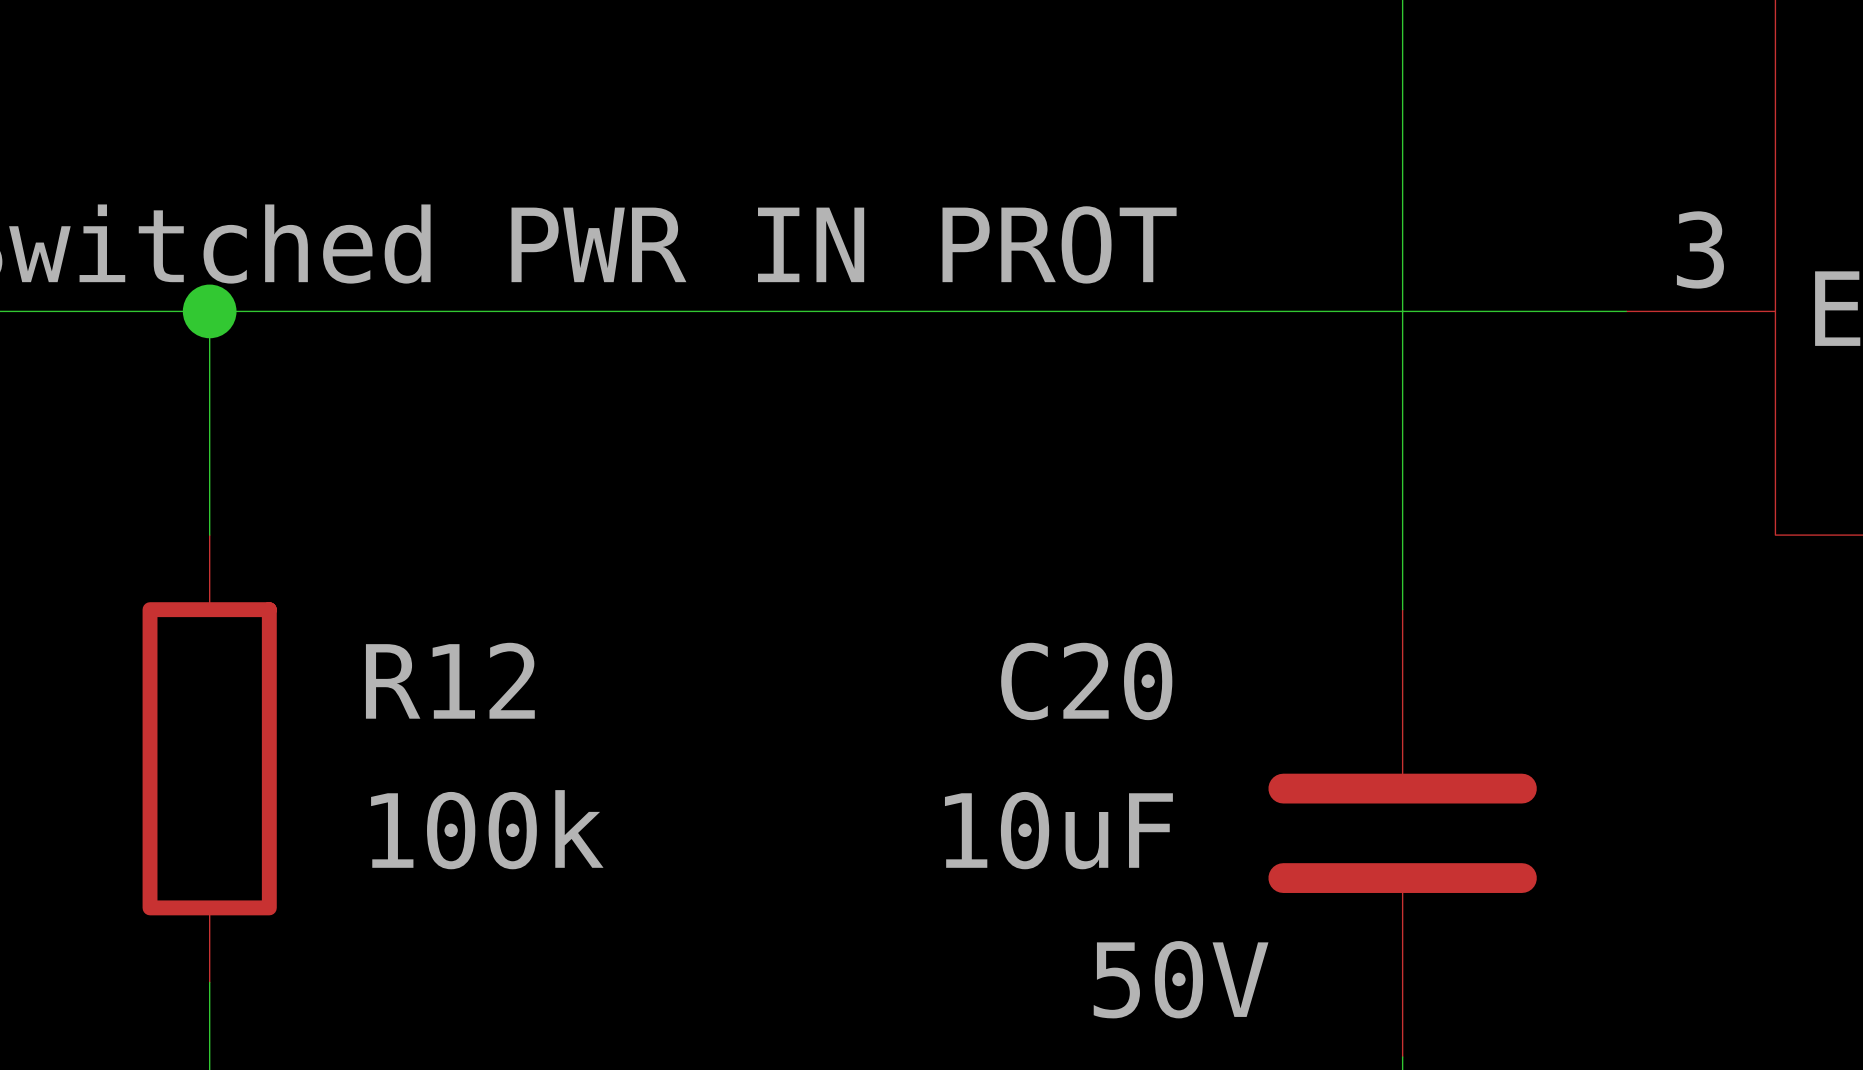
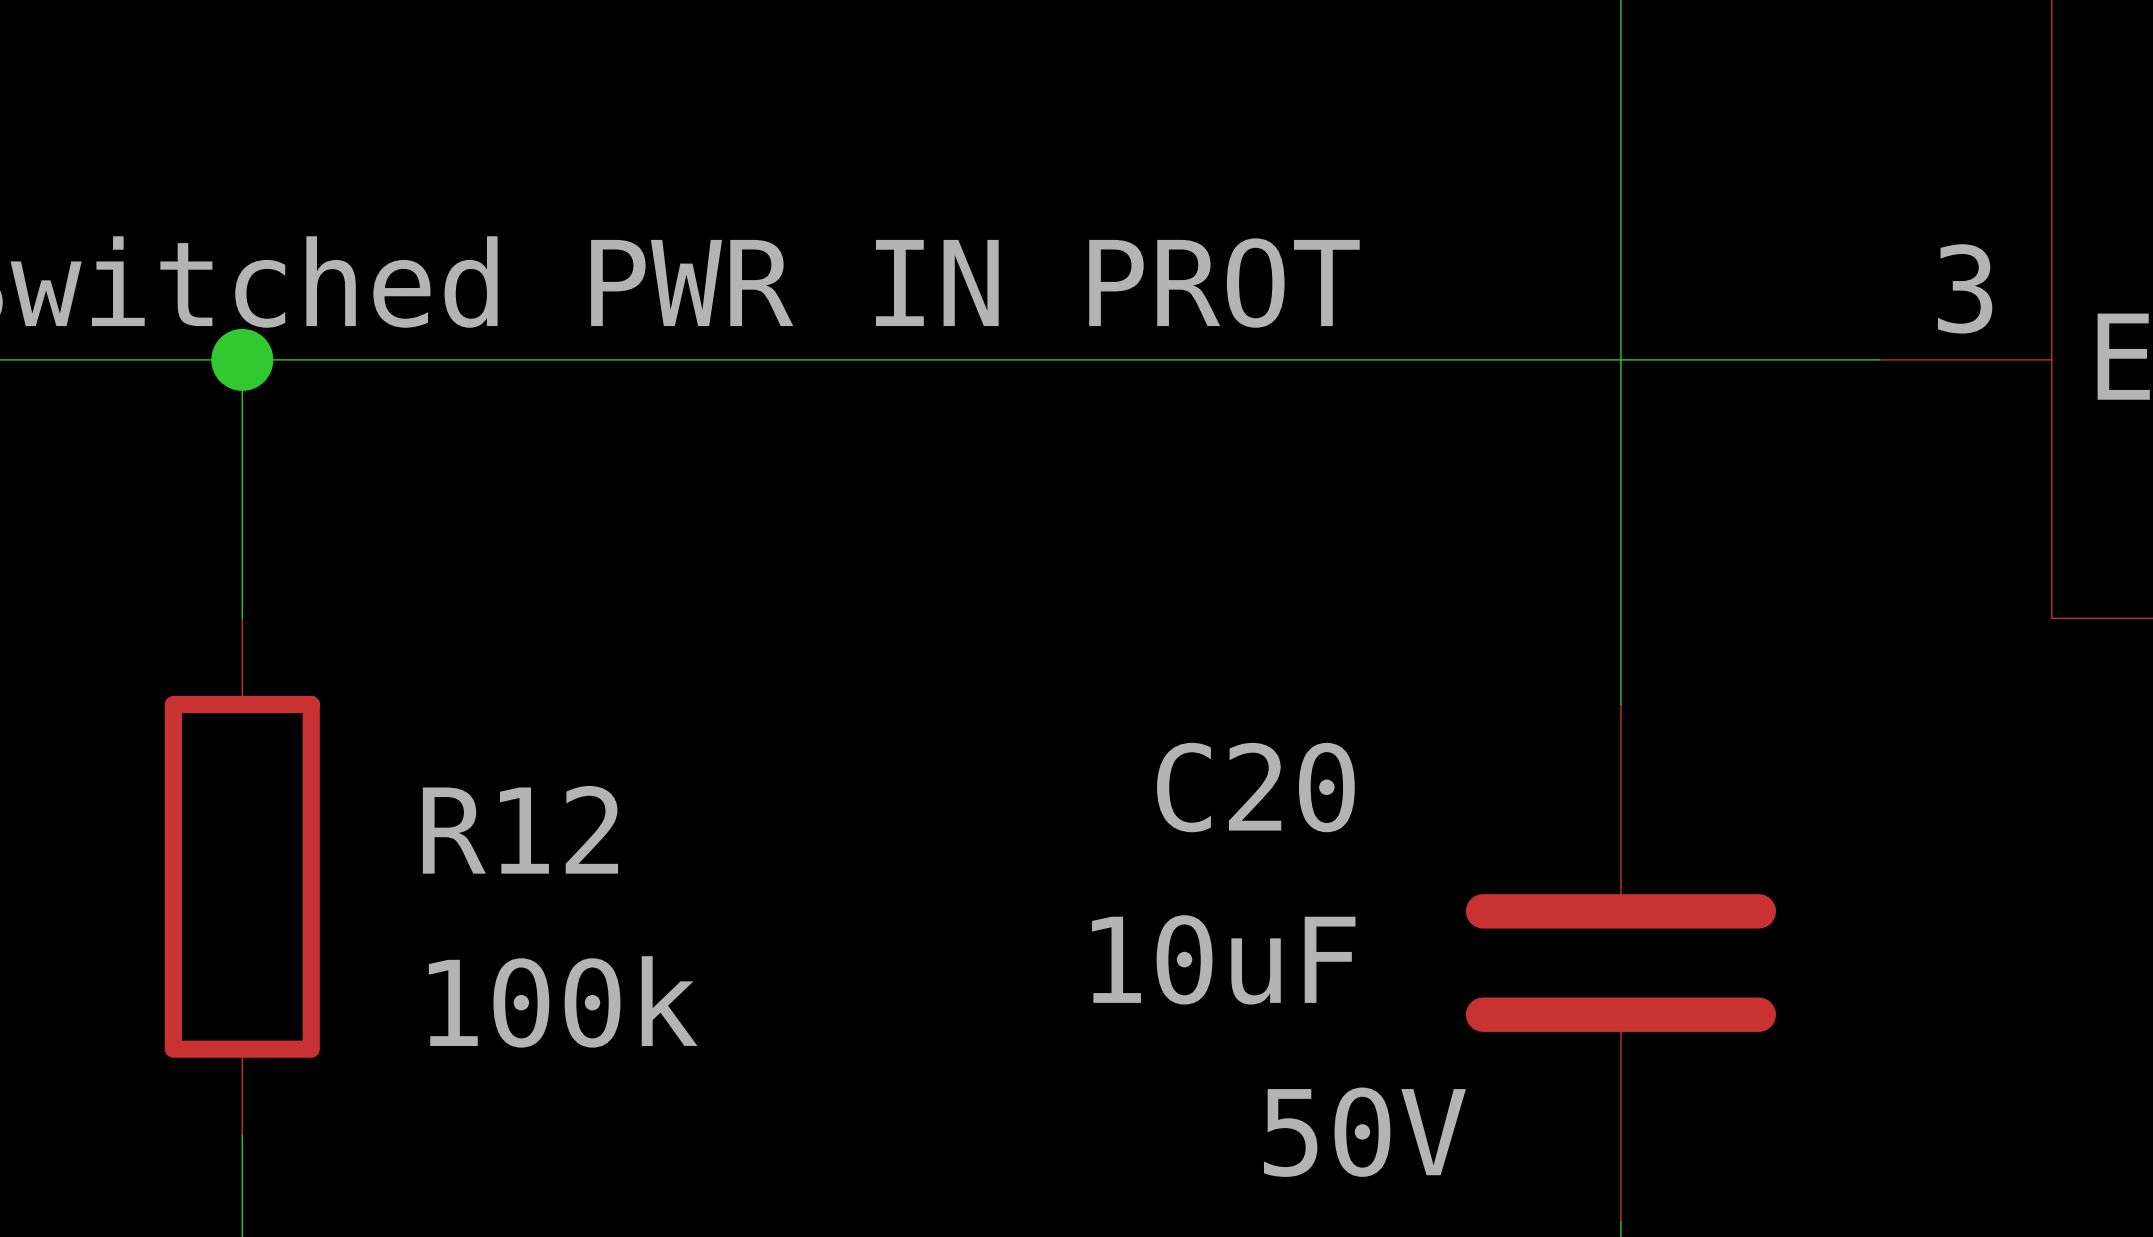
R12 name position: R12 (450, 680) -> R12 (520, 829)
R12 value position: 100k (487, 829) -> 100k (563, 1001)

